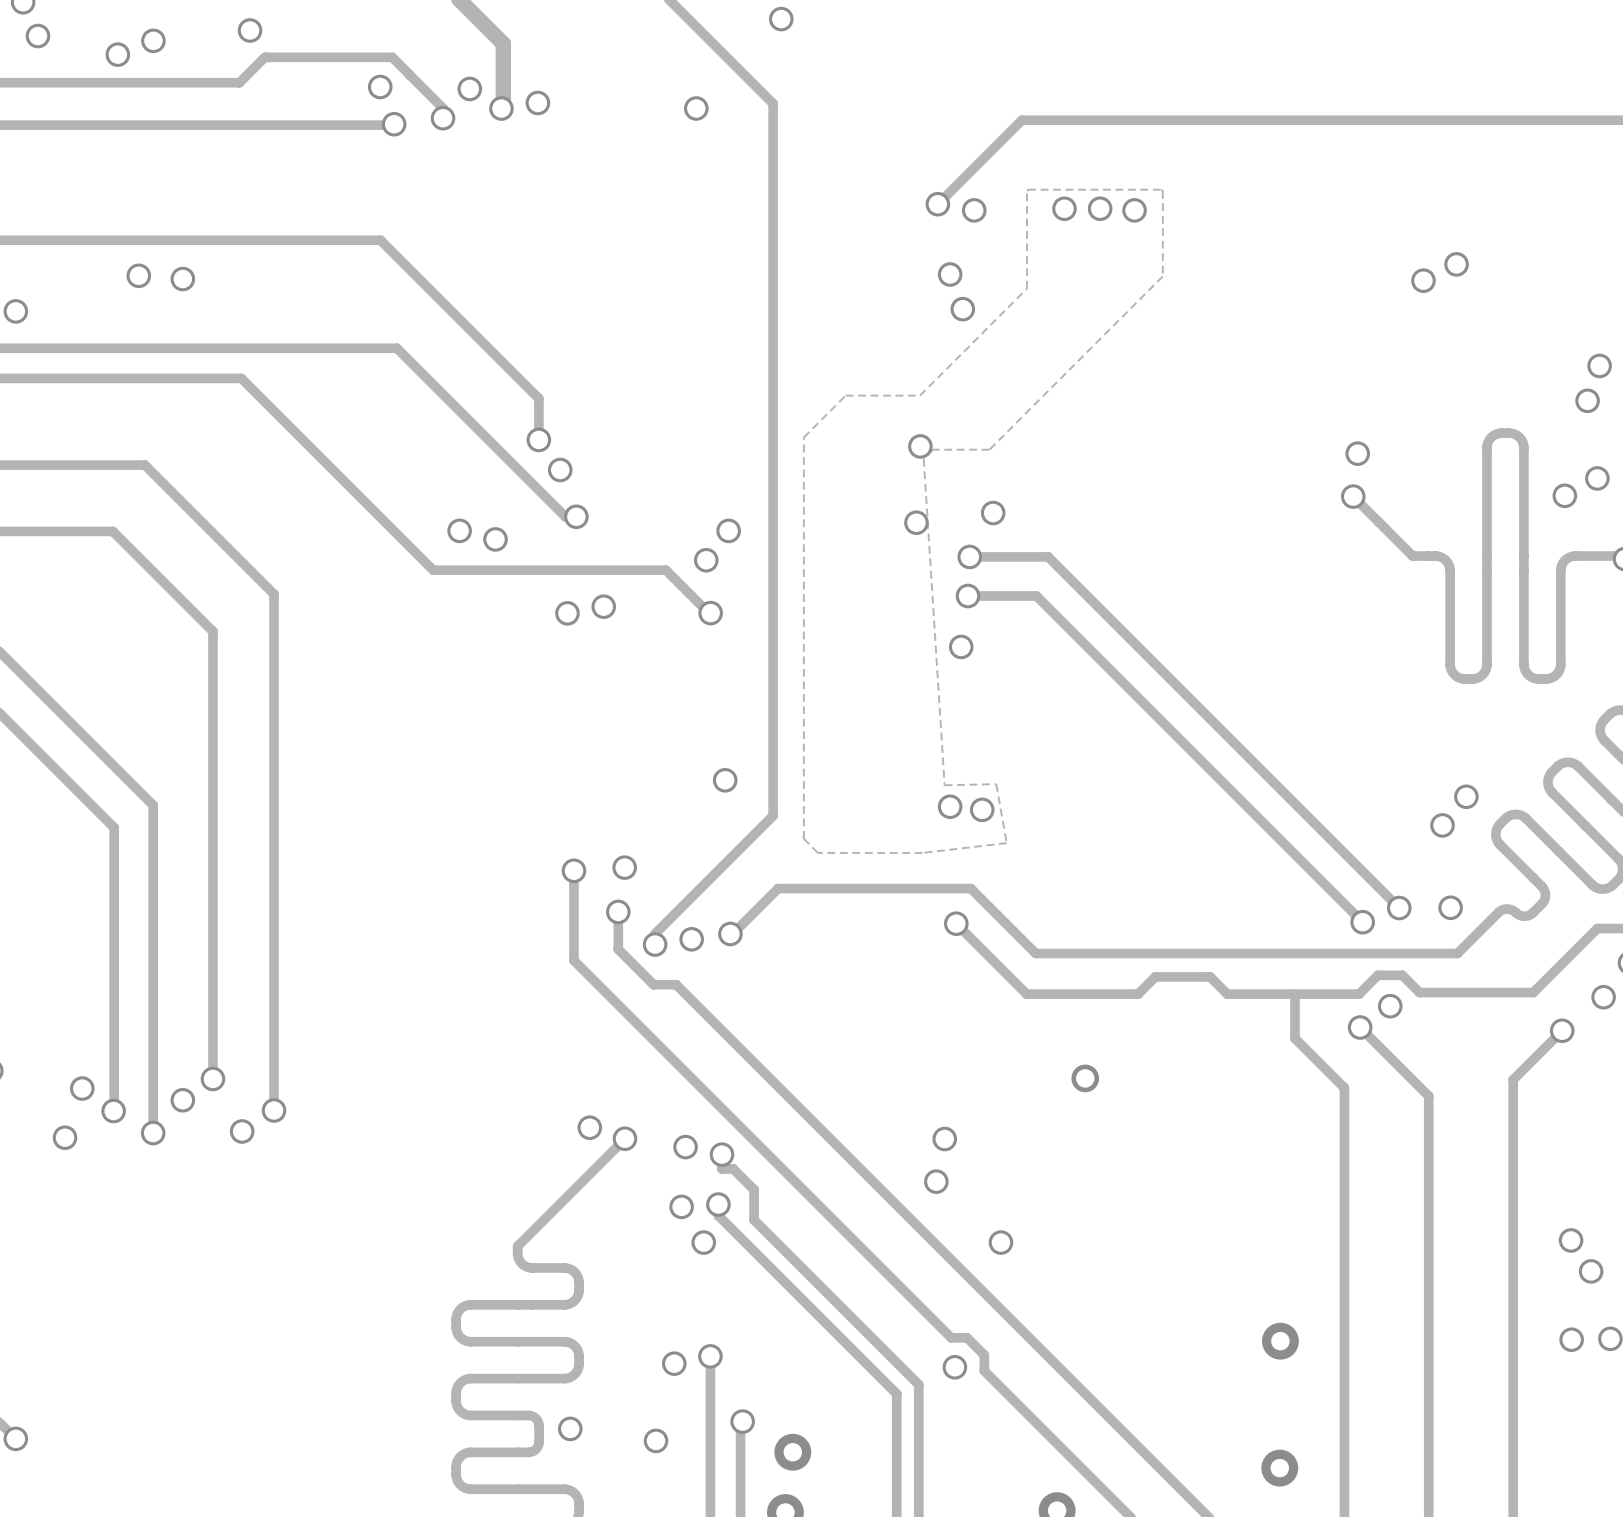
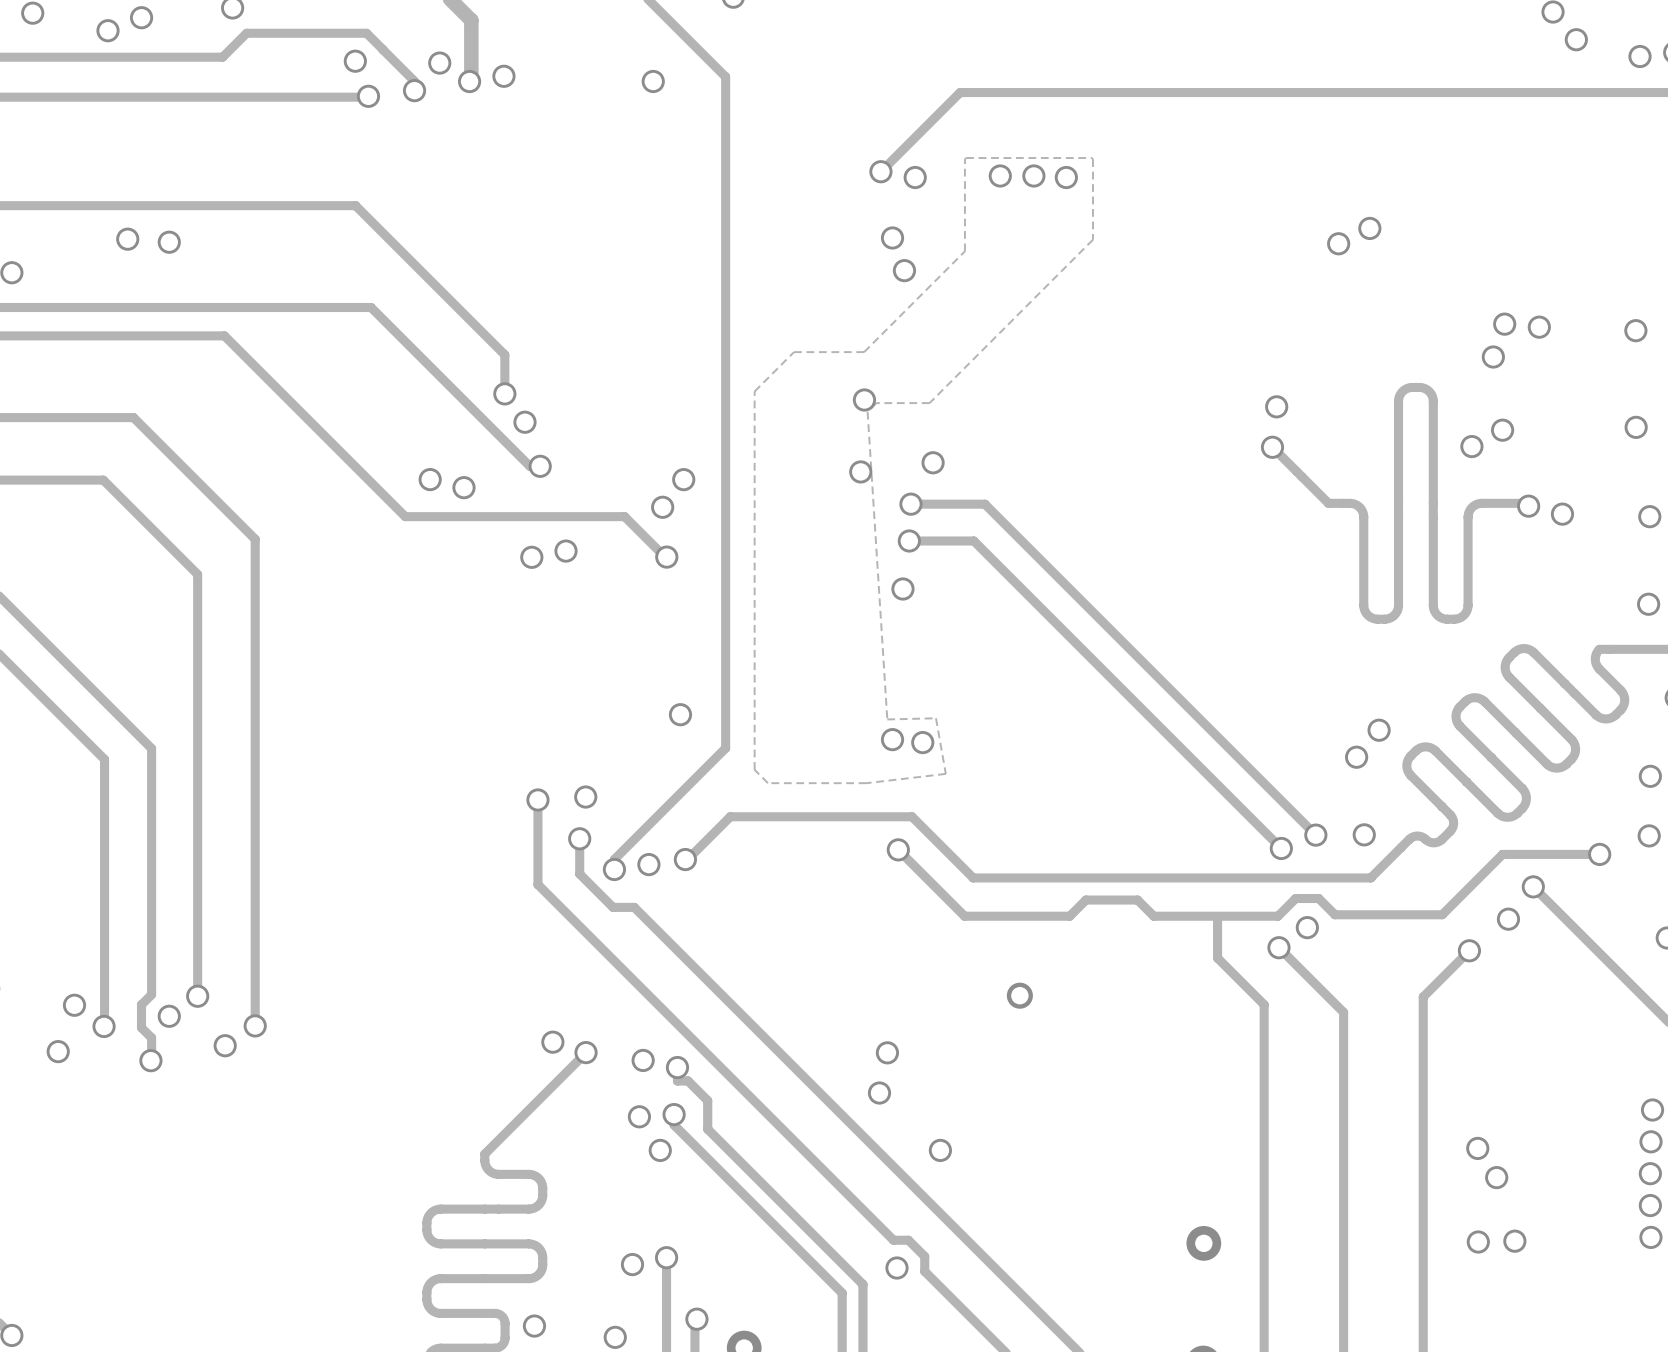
track: (153, 805) (153, 1133) -> (141, 738) (151, 748) (151, 994) (141, 1004) (141, 1027) (151, 1037) (151, 1060)
via position: (153, 1133) -> (150, 1060)

